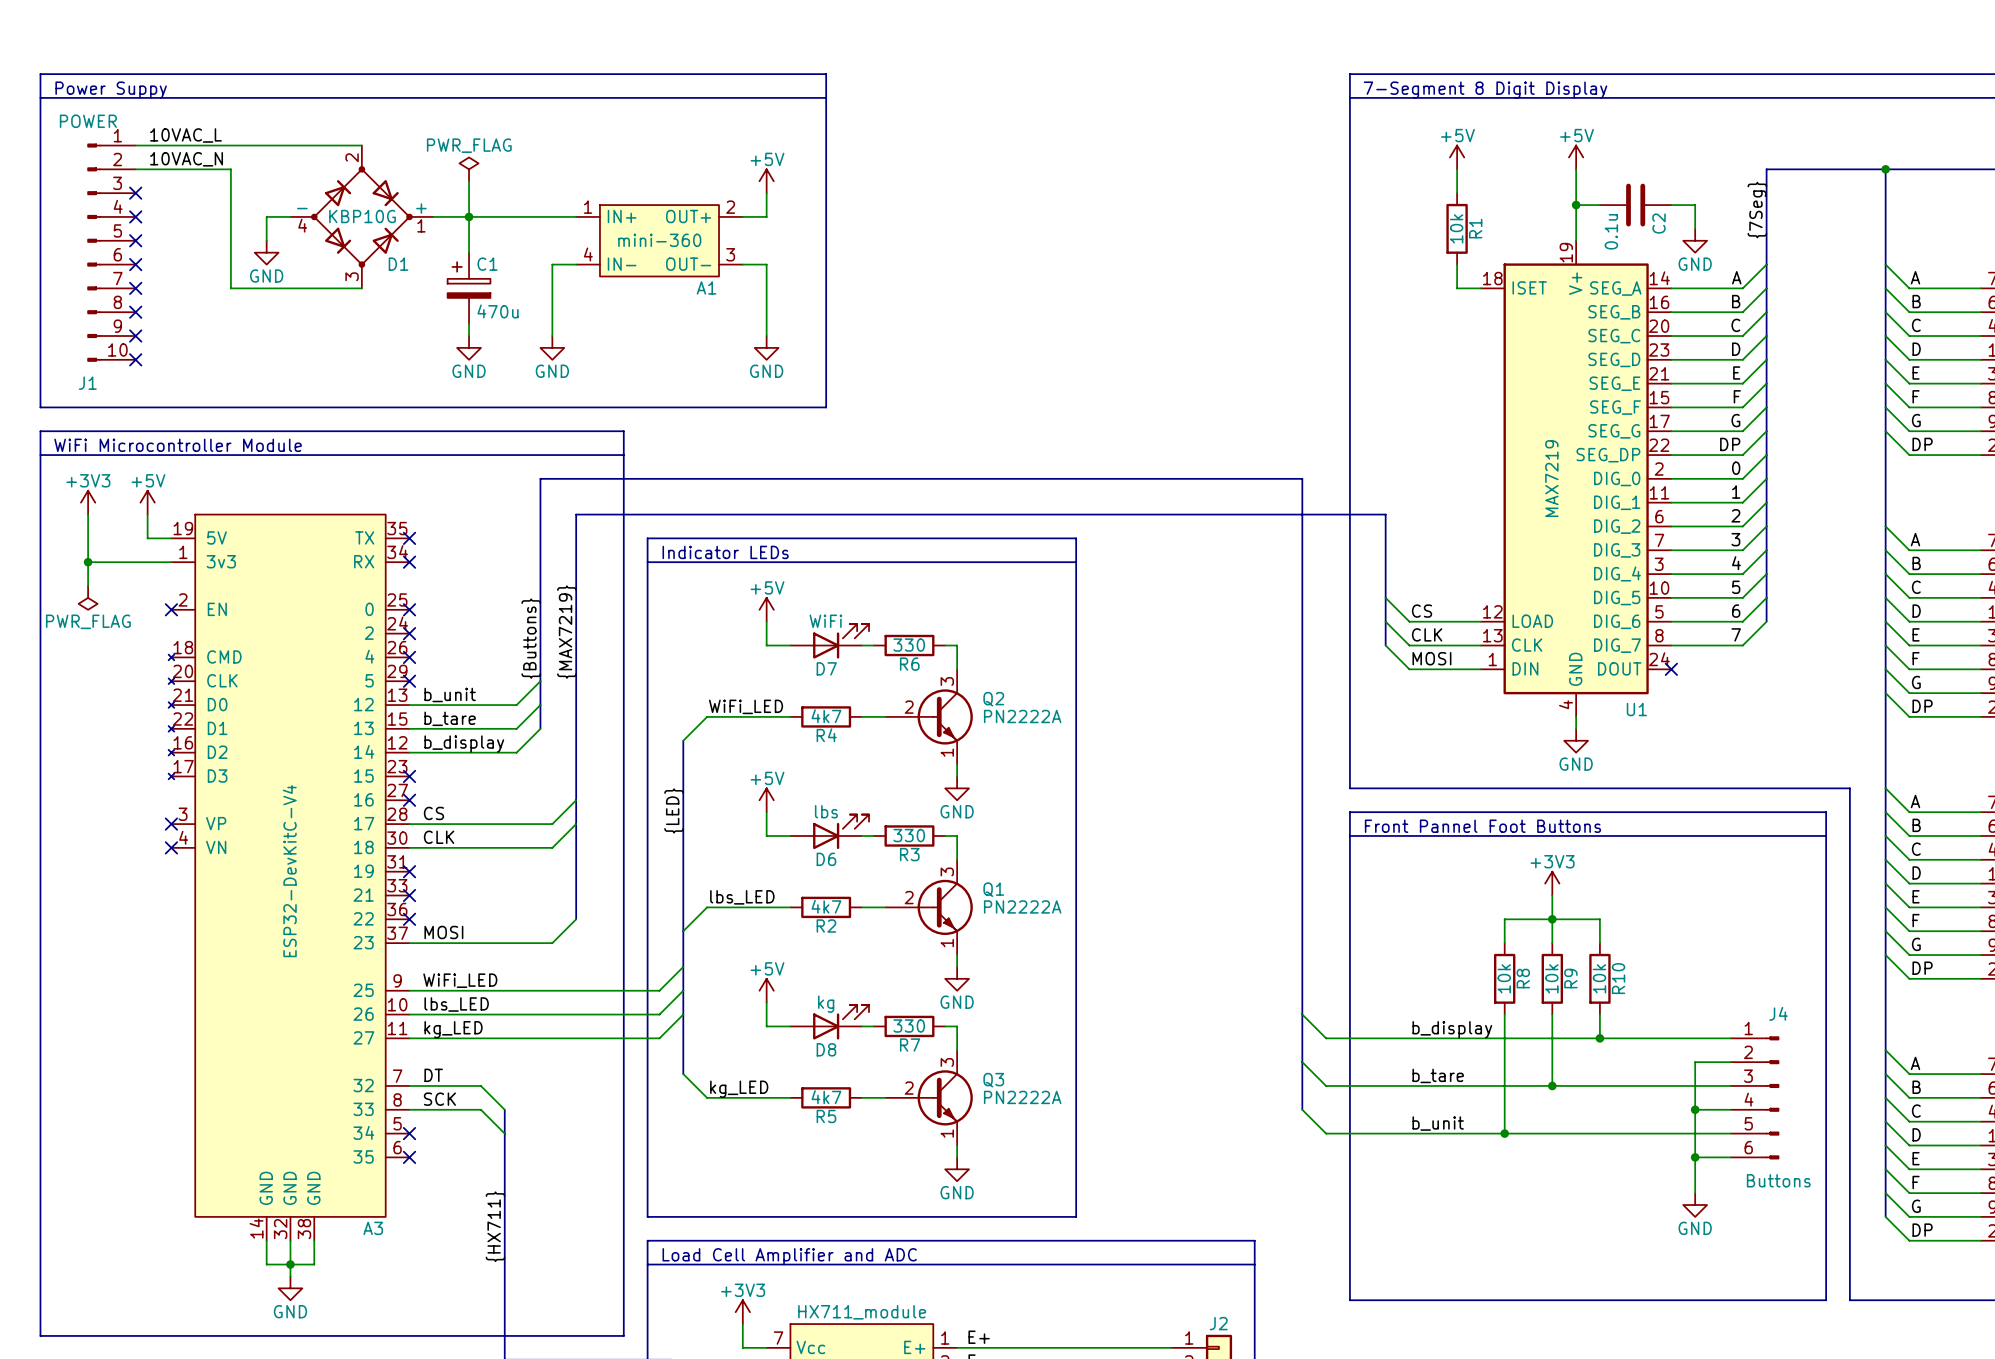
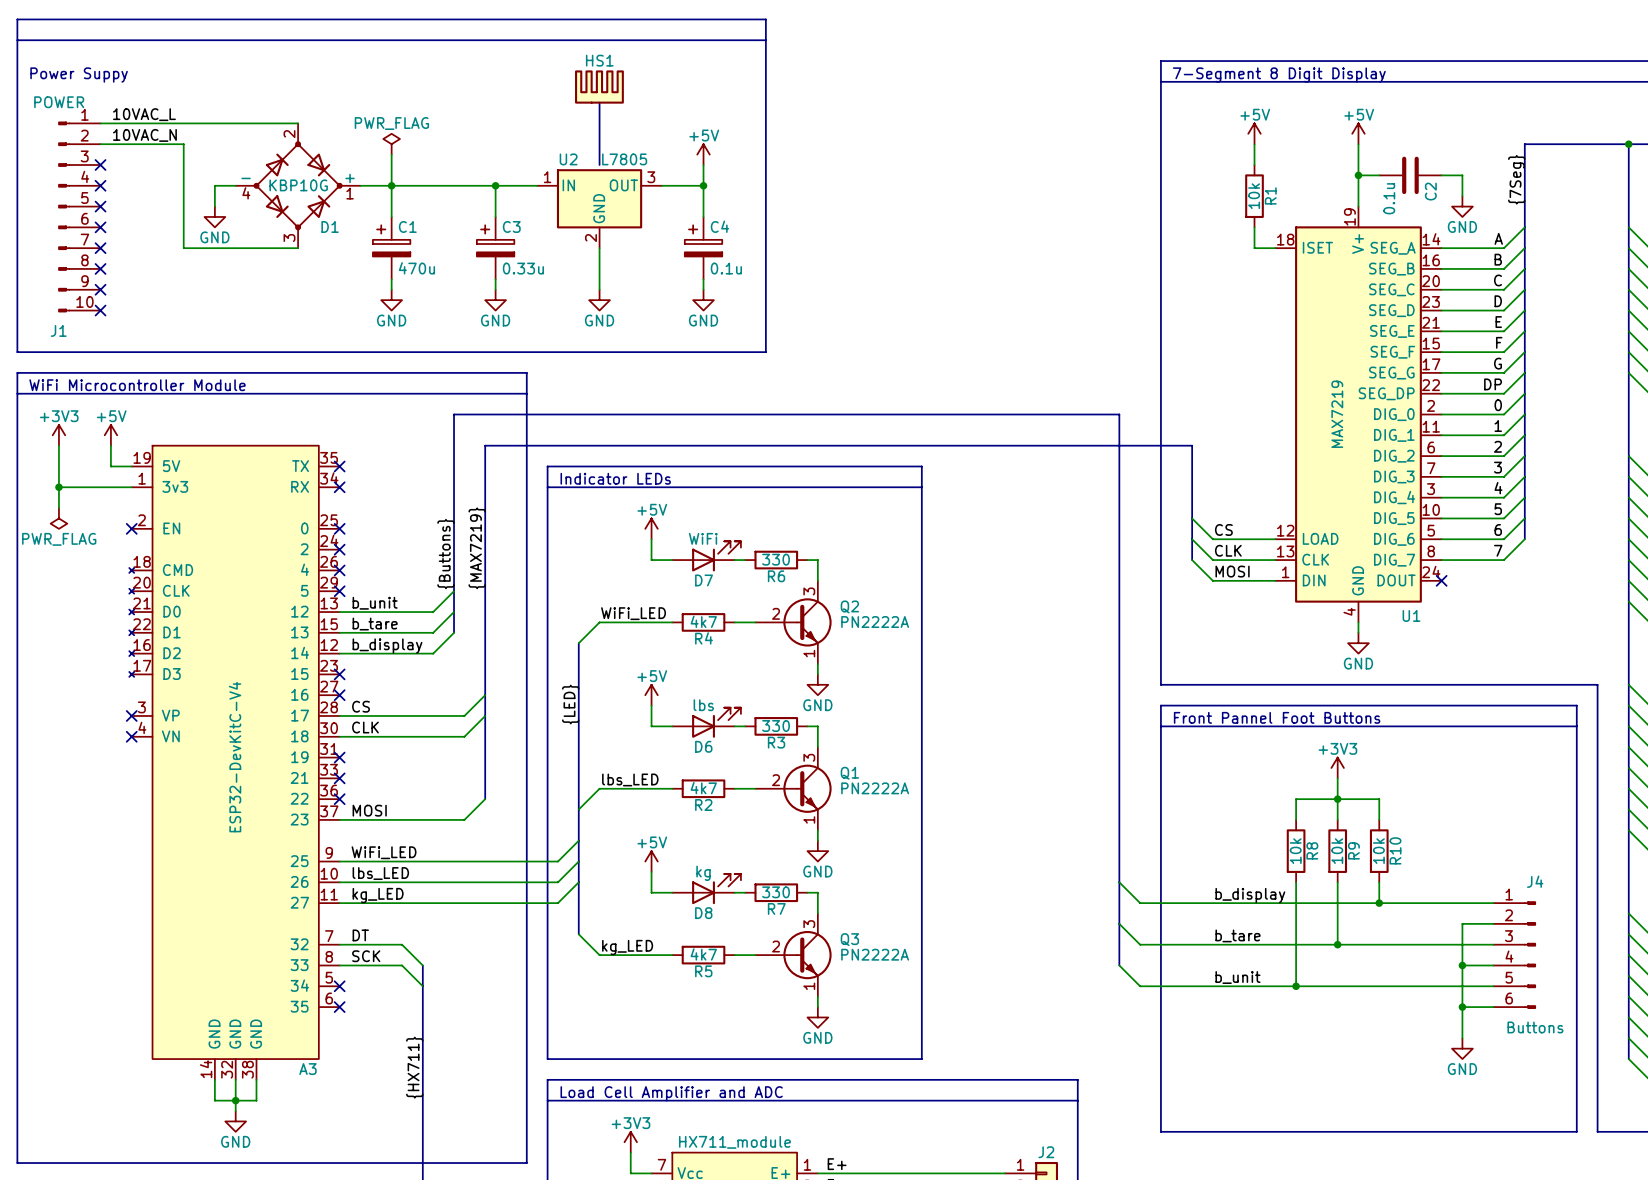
line: none -> (17, 40) (765, 40)
line: (40, 74) (826, 74) (826, 407) -> (17, 61) (17, 19) (765, 19) (765, 352) (703, 352)
line: (40, 97) (826, 97) -> none
HS1: none -> (599, 87)
line: none -> (599, 102) (599, 164)
power symbol position: +5V (766, 181) -> +5V (703, 154)
wire: none -> (495, 185) (495, 216)
junction: none -> (495, 185)
wire: none -> (661, 185) (703, 185)
junction: none -> (703, 185)
A1: mini-360 (659, 240) -> none
U2: none -> L7805 (599, 208)
wire: (576, 264) (552, 264) (552, 336) -> none
wire: (742, 264) (766, 264) (766, 336) -> none
C3: none -> 0.33u (495, 248)
wire: none -> (599, 248) (599, 289)
C4: none -> 0.1u (703, 248)
wire: none -> (495, 279) (495, 289)
power symbol position: GND (552, 347) -> GND (495, 300)
power symbol: none -> GND (599, 300)
power symbol: GND (766, 347) -> none
power symbol: none -> GND (703, 300)

